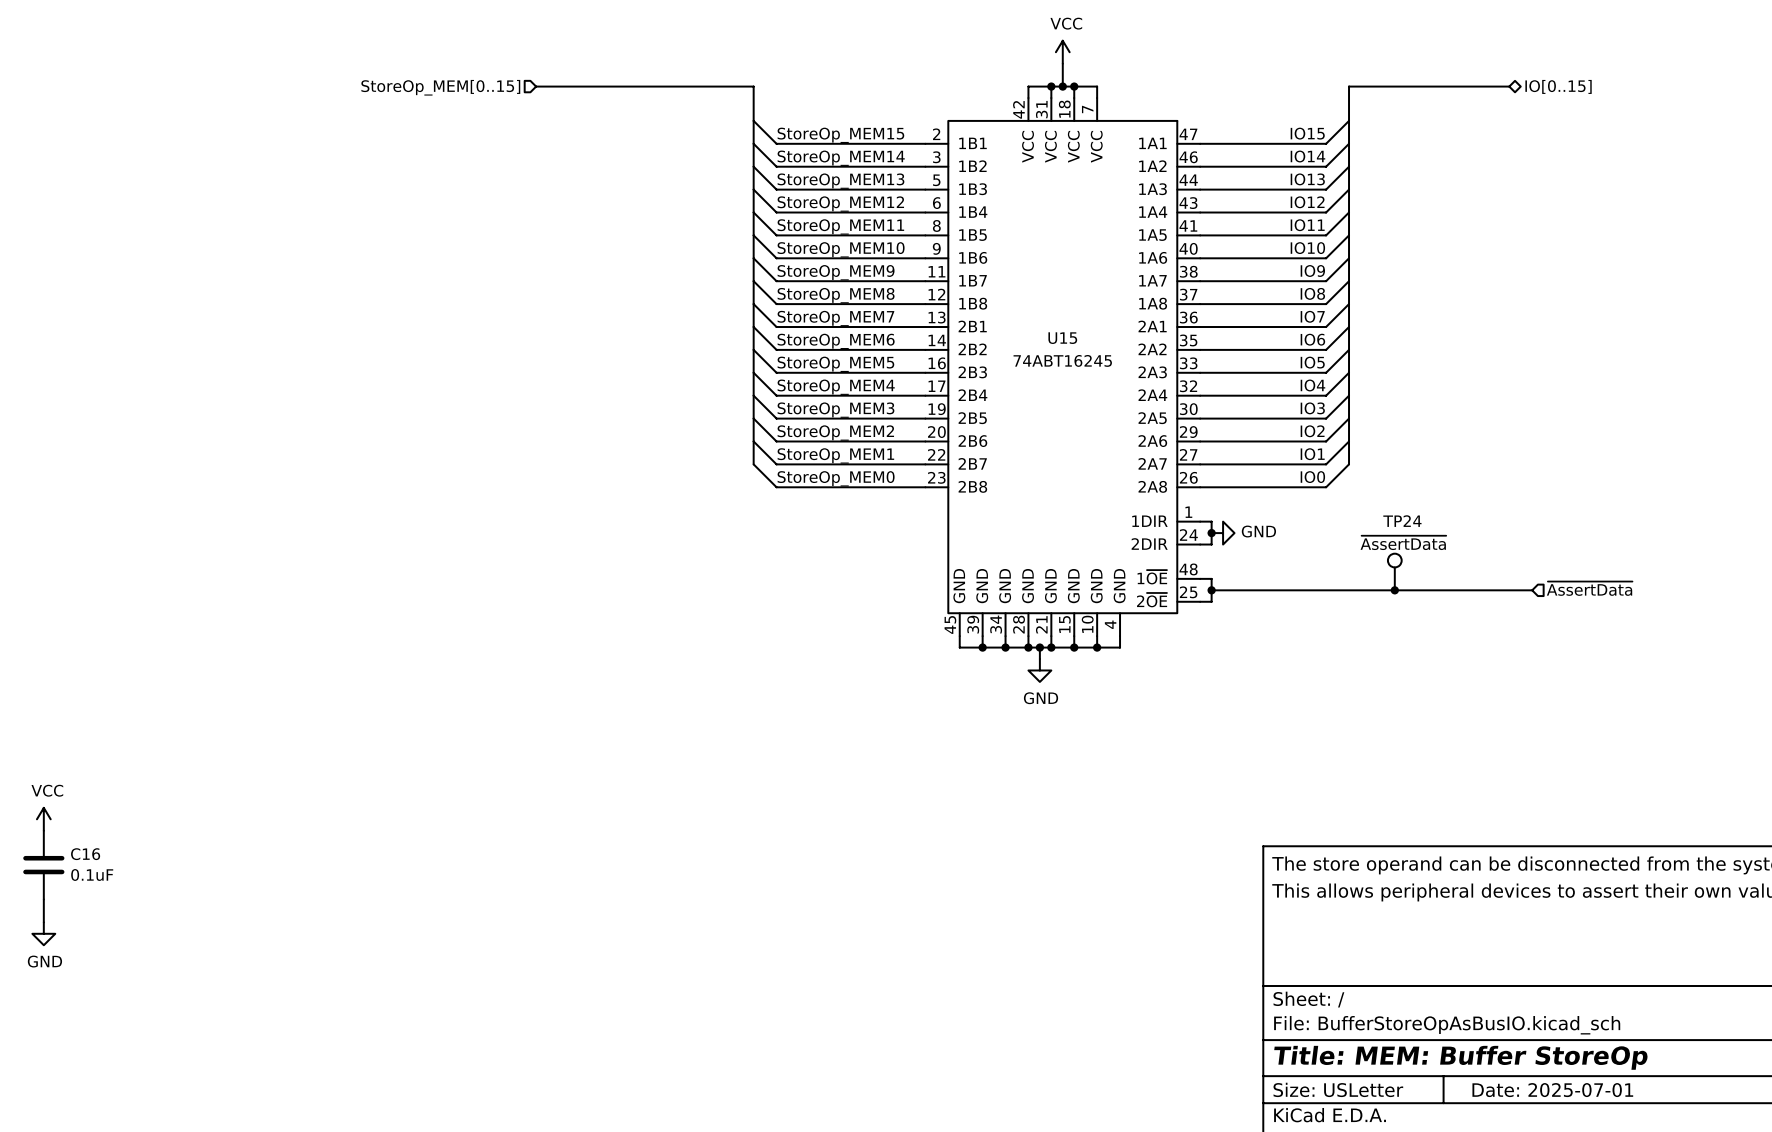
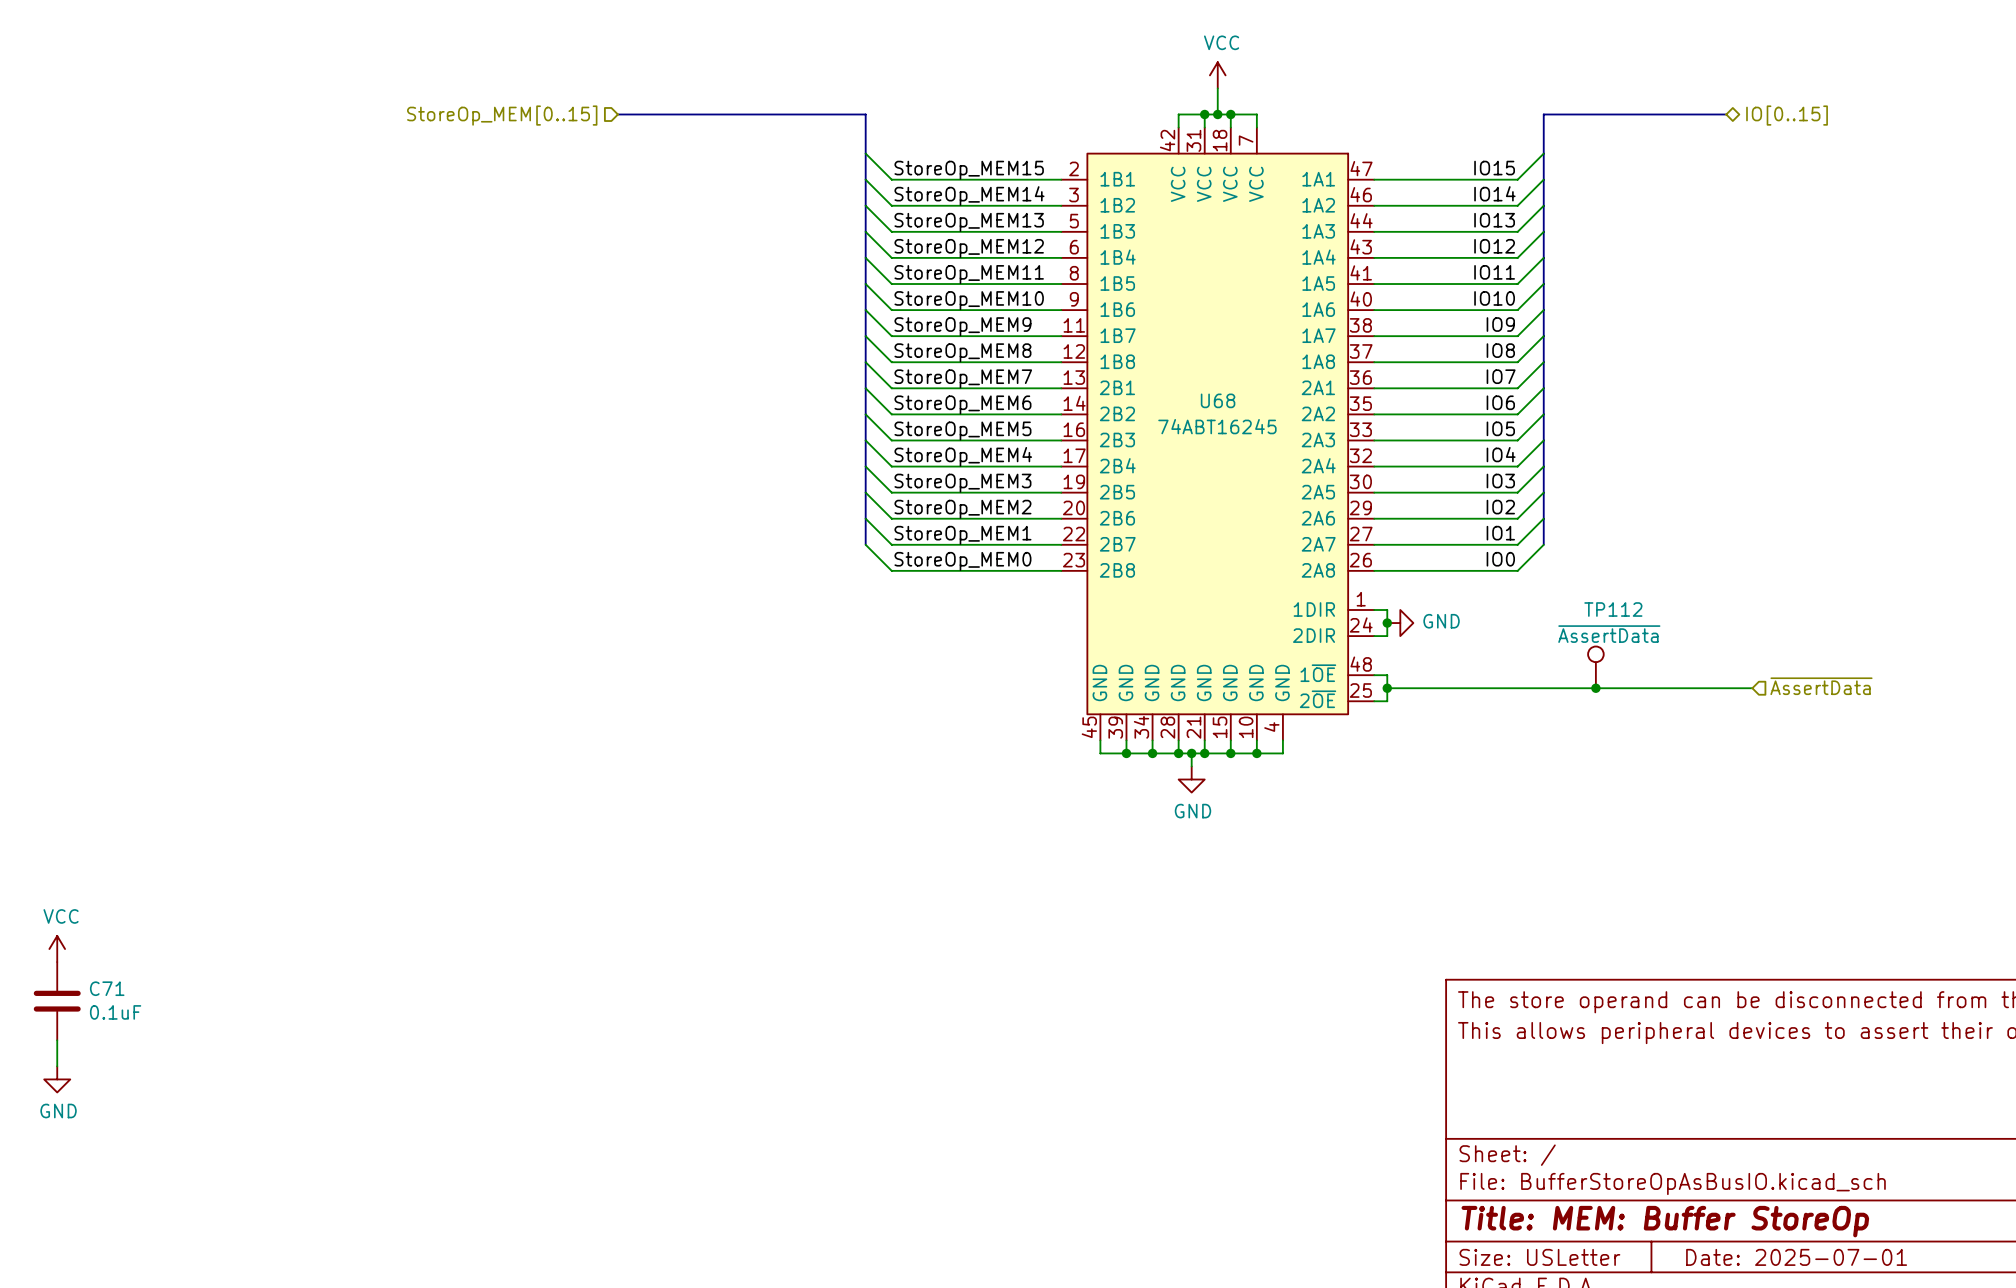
U15 name: U15 (1062, 338) -> U68 (1218, 400)
TP24 name: TP24 (1402, 521) -> TP112 (1613, 609)
C16 name: C16 (85, 854) -> C71 (107, 988)

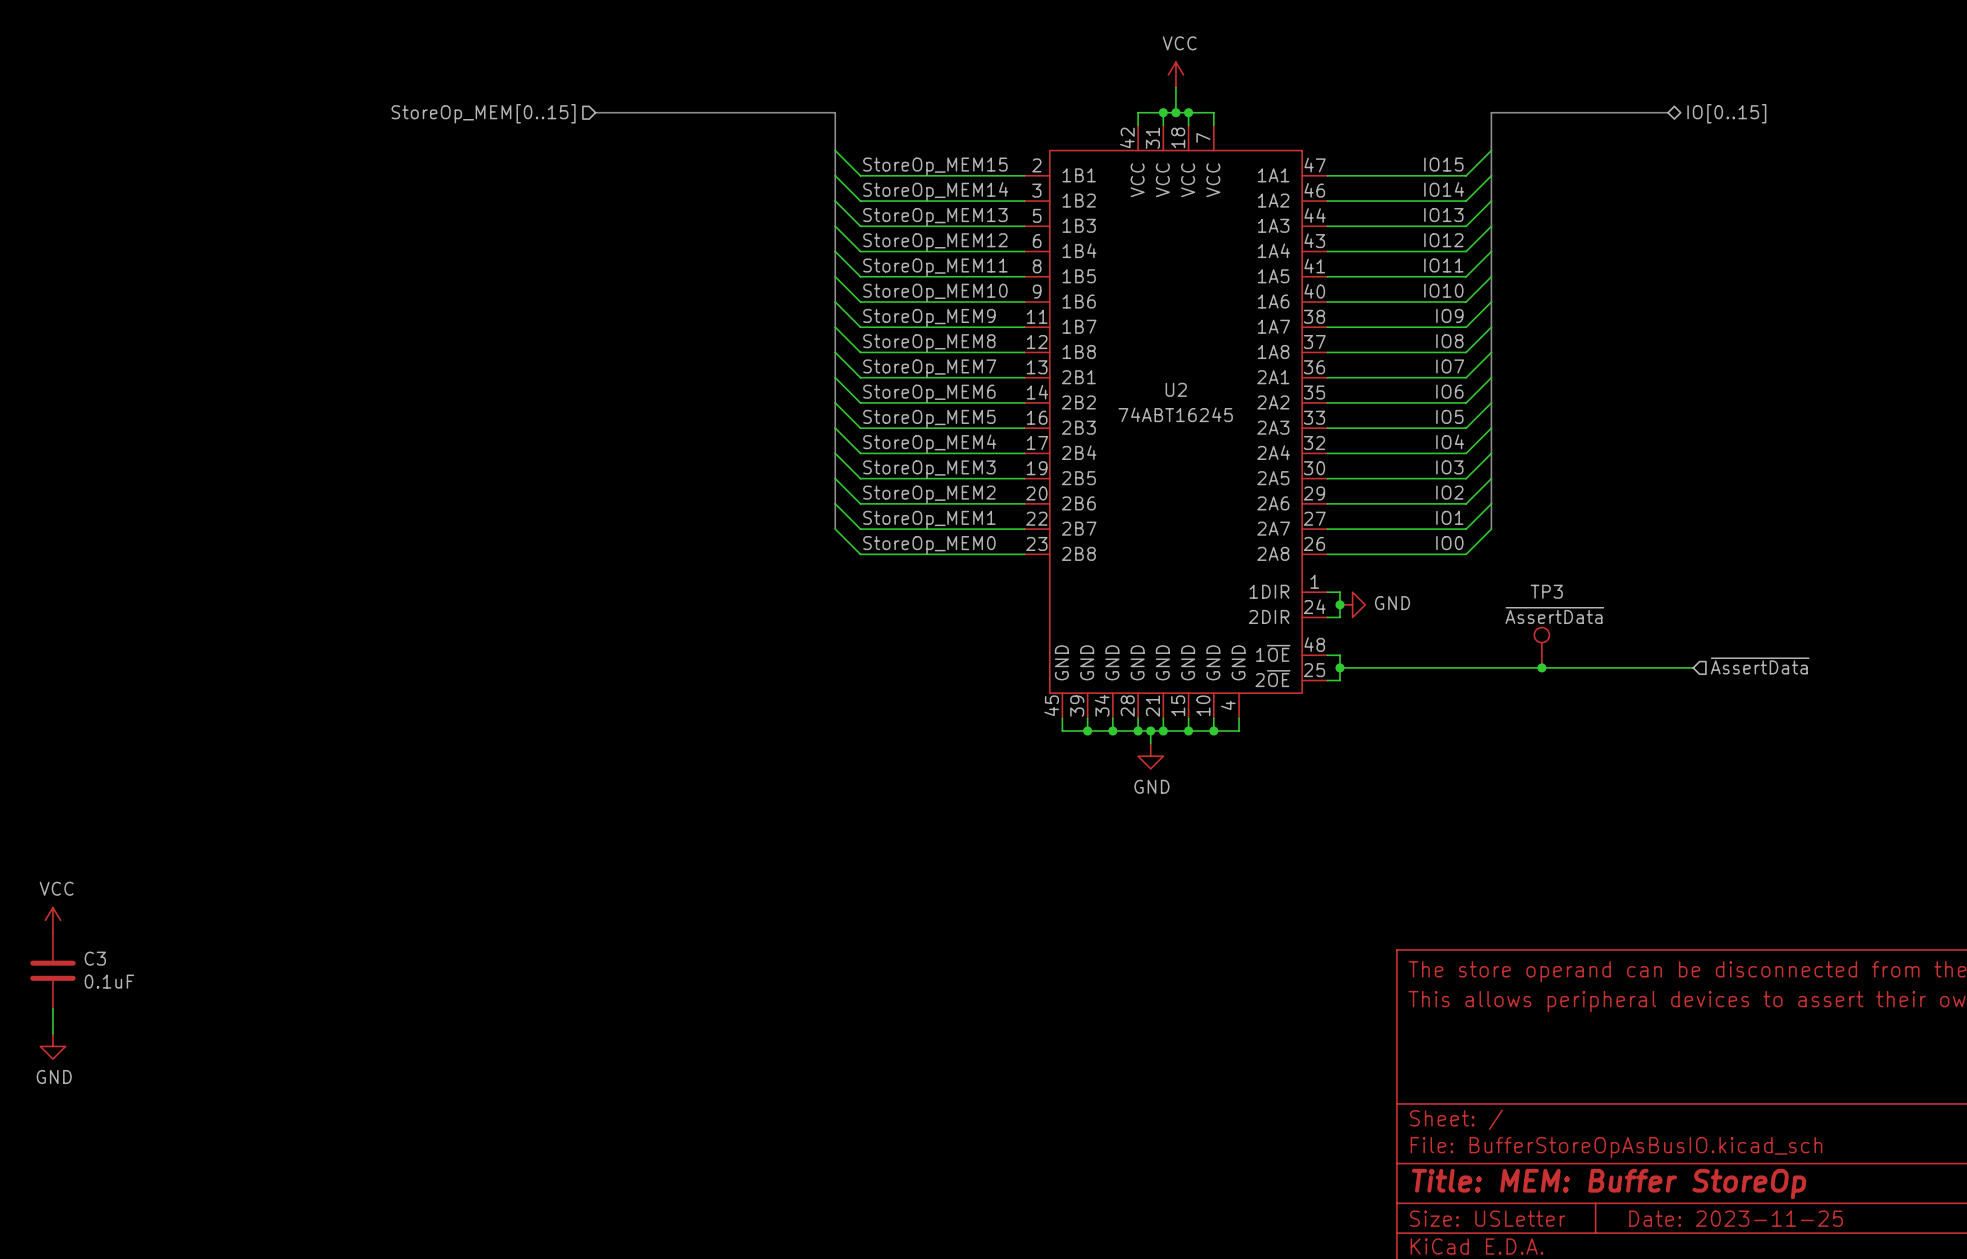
U68 name: U68 (1218, 400) -> U2 (1176, 389)
TP112 name: TP112 (1613, 609) -> TP3 (1546, 591)
C71 name: C71 (107, 988) -> C3 (95, 958)
title block: Date: 2025-07-01 (1796, 1257) -> Date: 2023-11-25 (1736, 1218)

